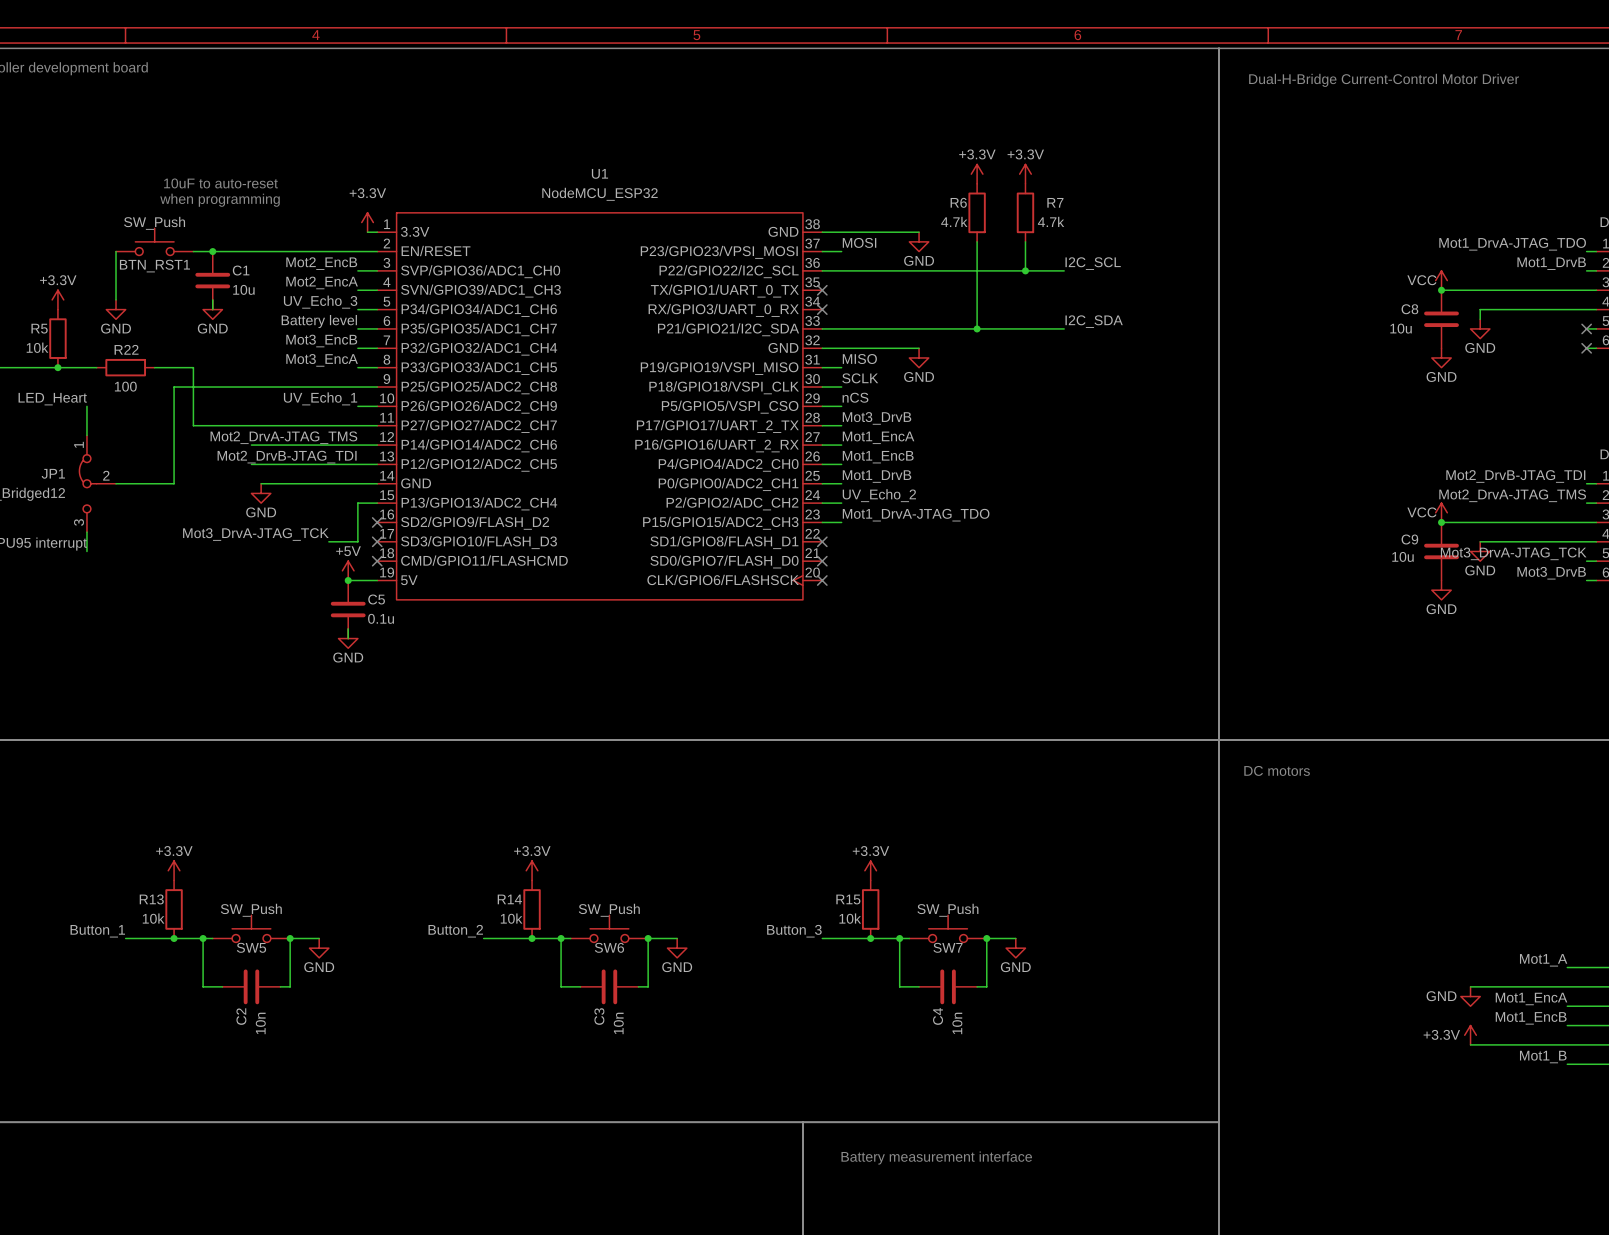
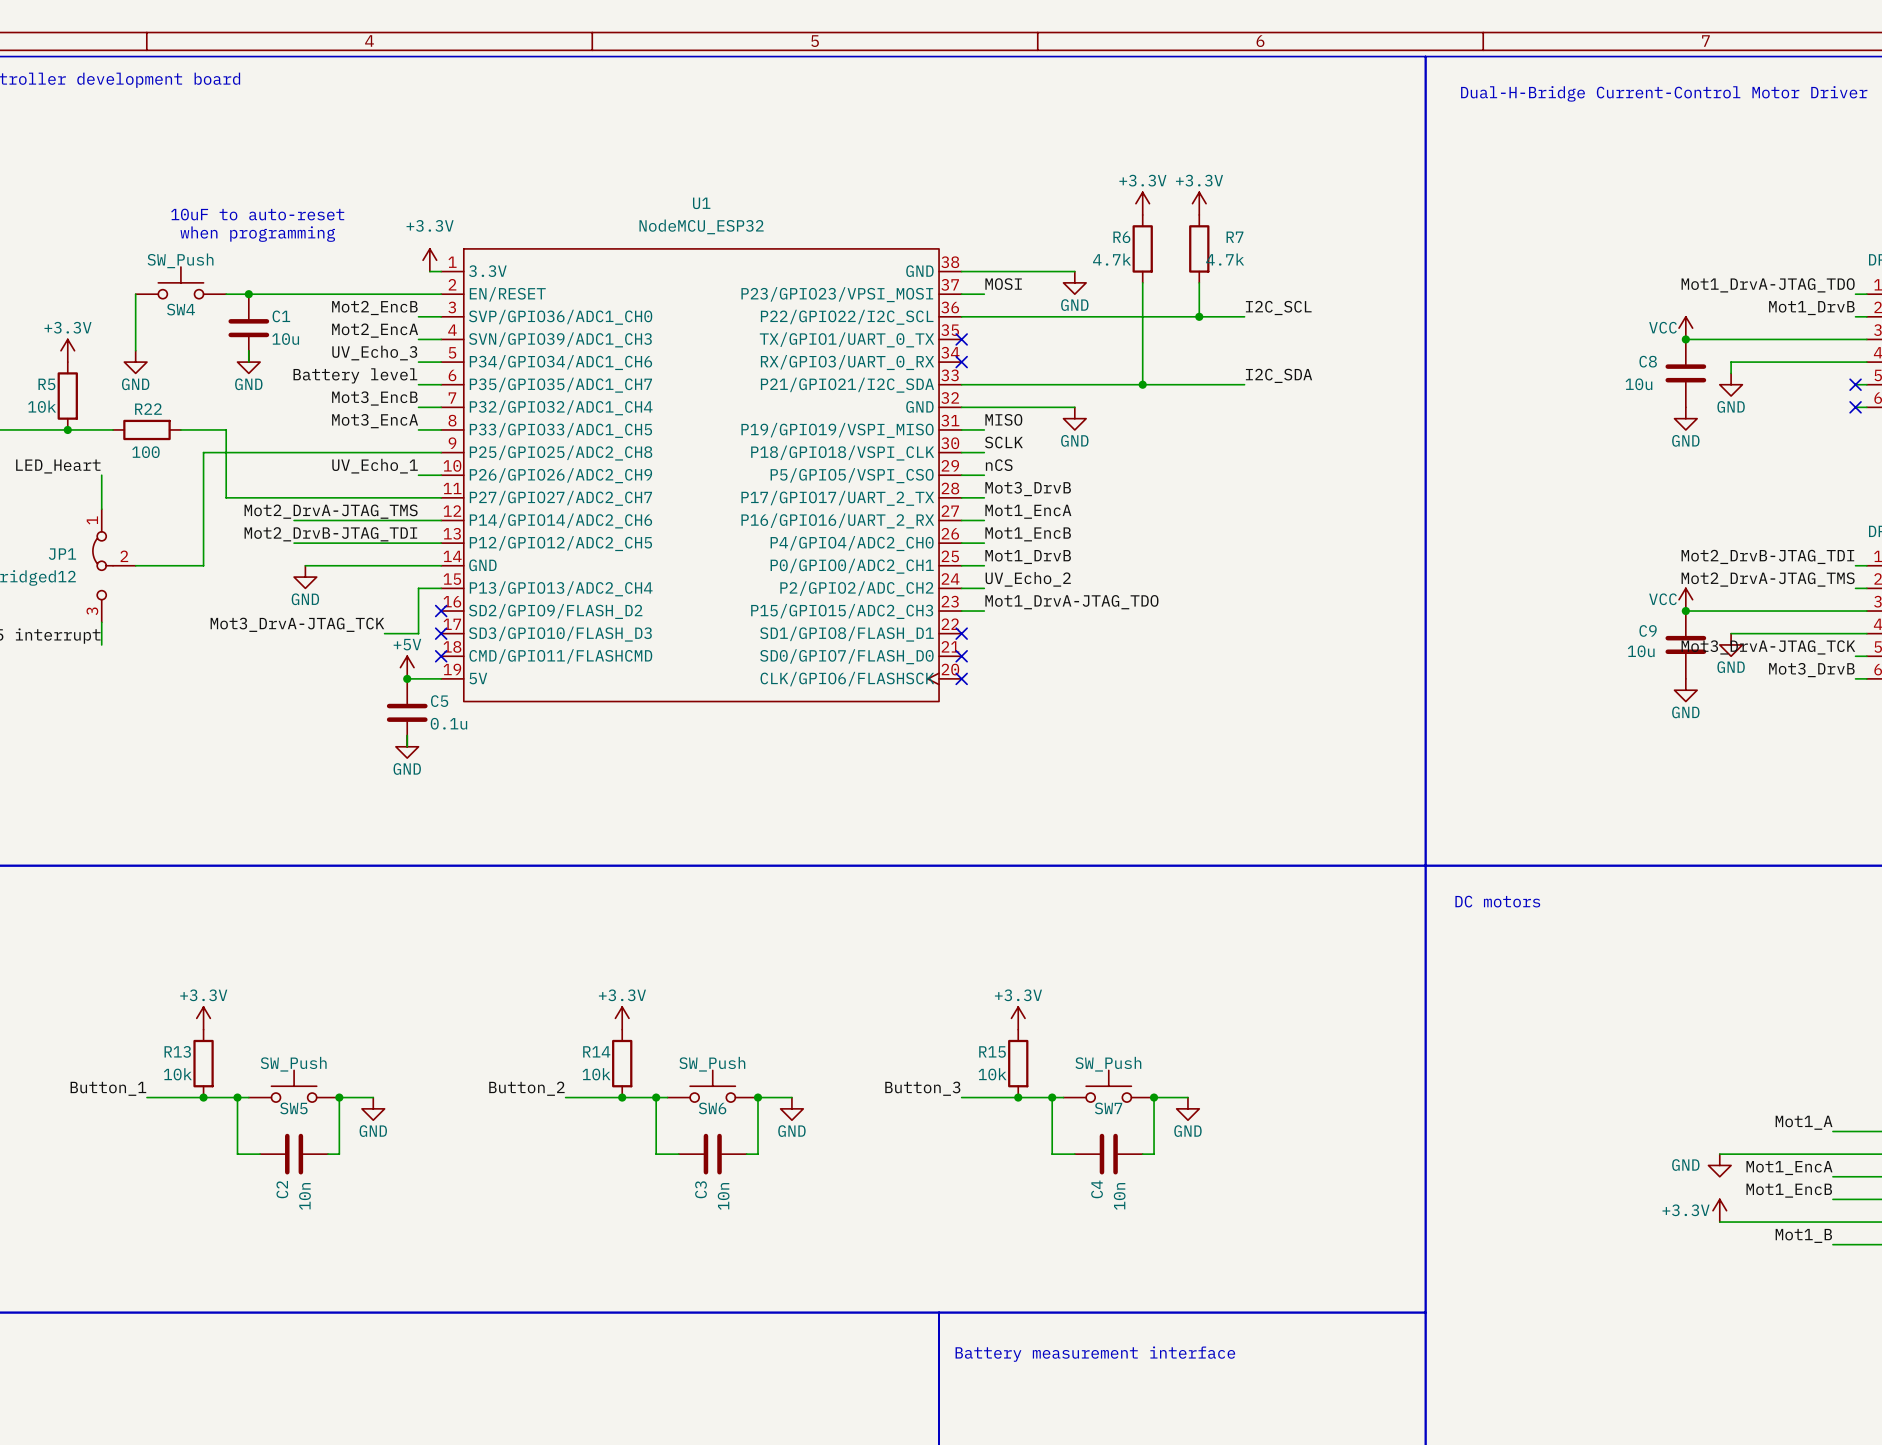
BTN_RST1 name: BTN_RST1 (154, 266) -> SW4 (180, 309)

